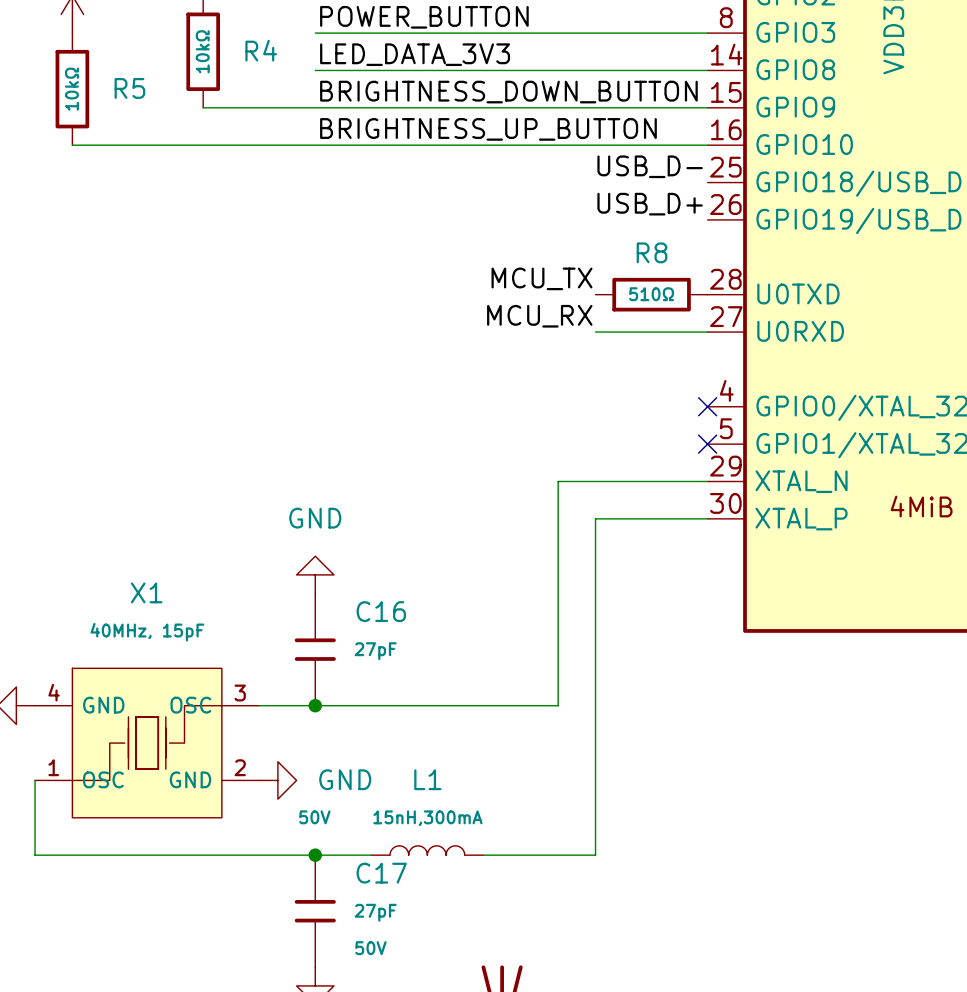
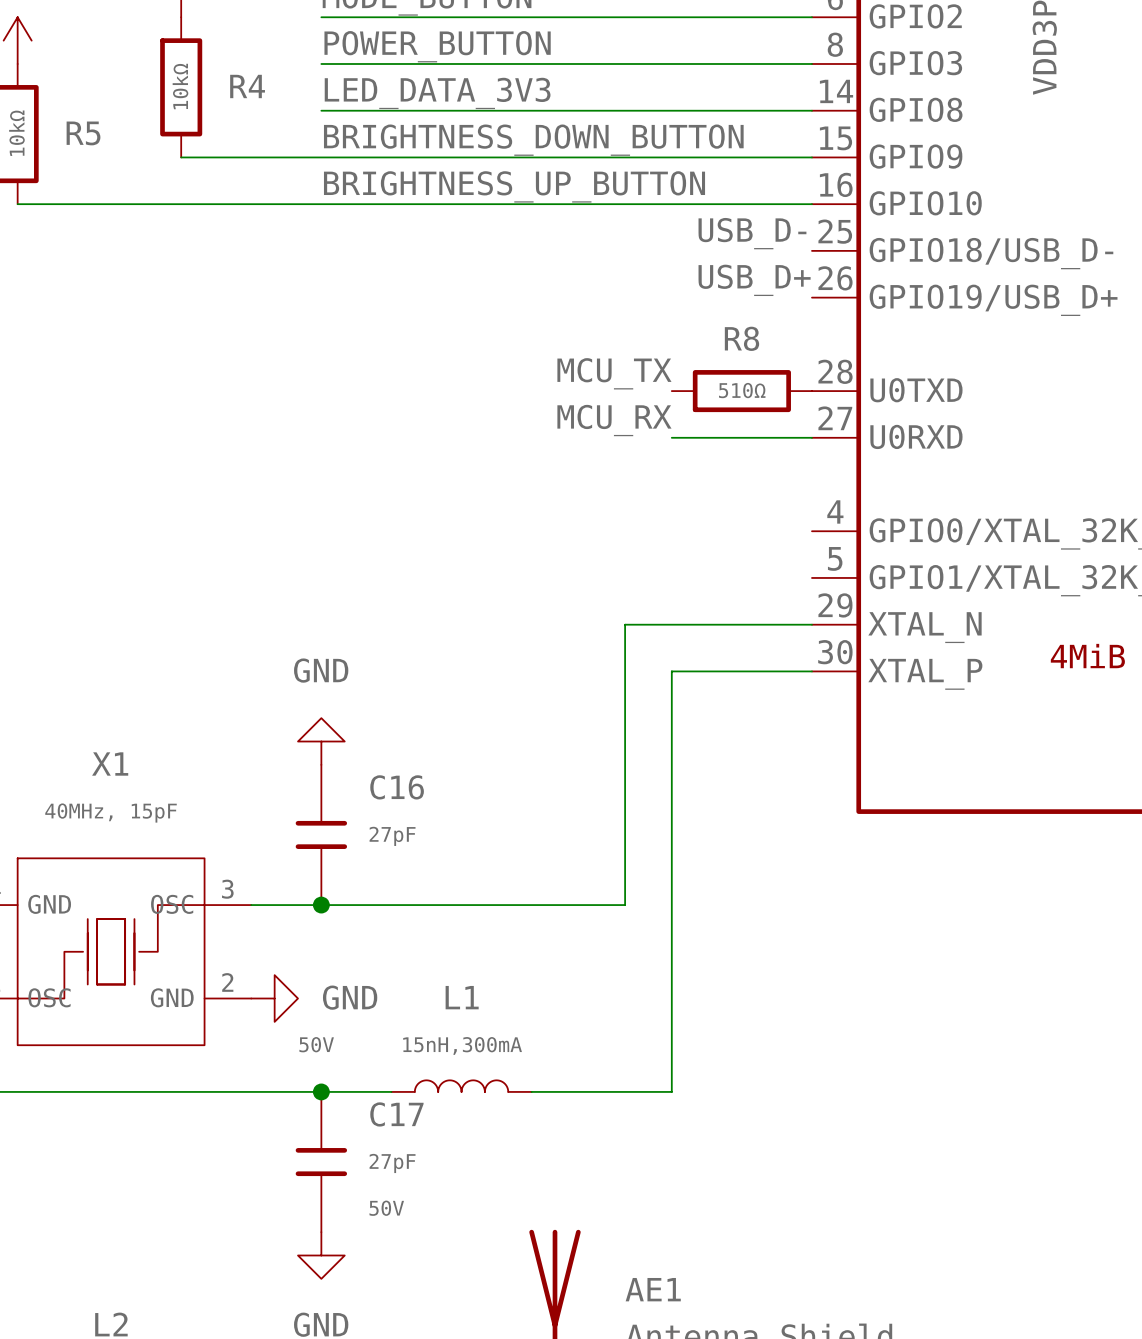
no-connect mark: (707, 406) -> none
no-connect mark: (707, 444) -> none

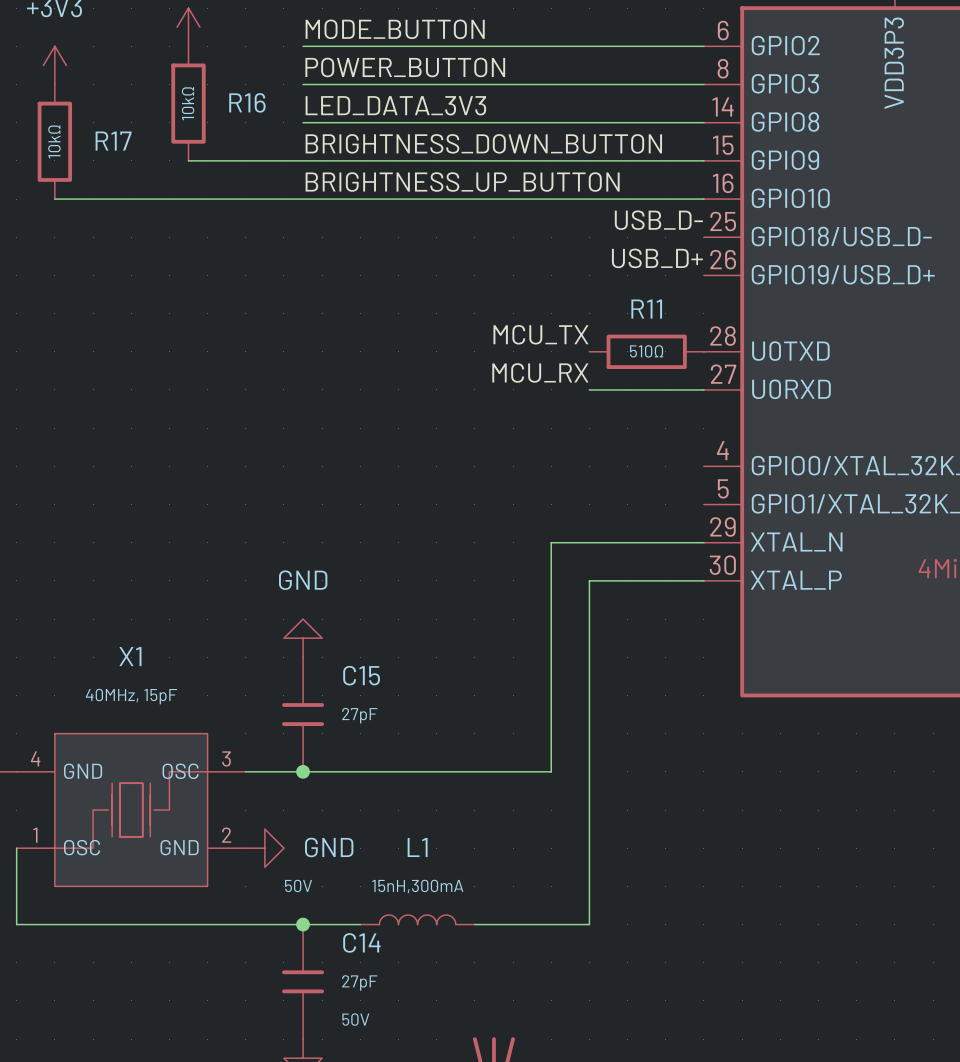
R4 name: R4 (247, 86) -> R16 (247, 102)
R5 name: R5 (83, 133) -> R17 (113, 141)
R8 name: R8 (741, 338) -> R11 (646, 309)
C16 name: C16 (397, 787) -> C15 (361, 675)
C17 name: C17 (396, 1114) -> C14 (361, 942)

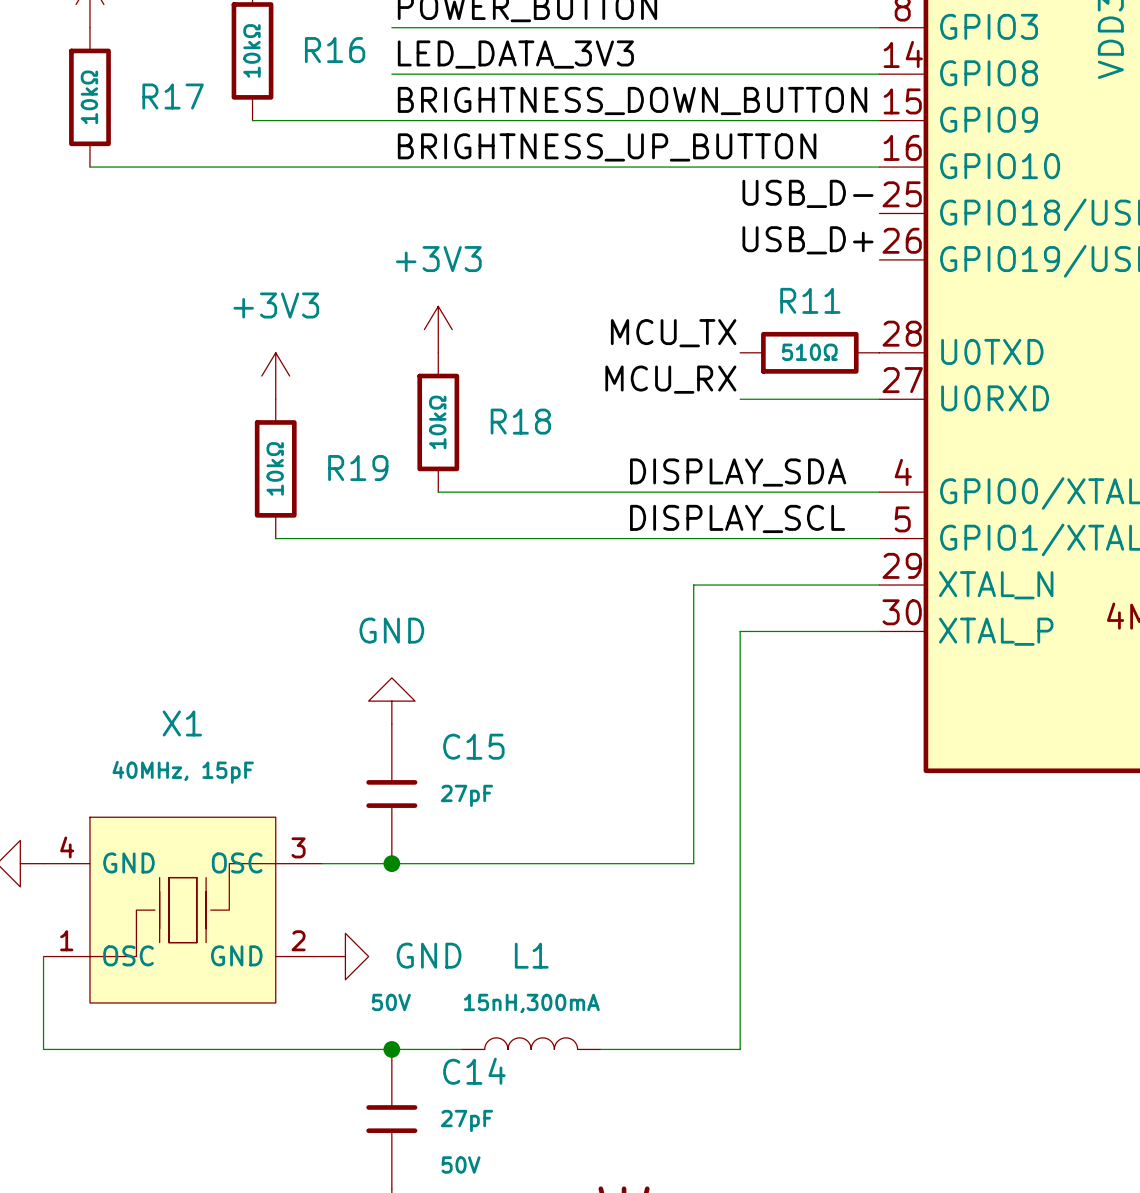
power symbol: none -> +3V3 (438, 329)
power symbol: none -> +3V3 (275, 376)
R18: none -> 10kΩ (438, 422)
R19: none -> 10kΩ (275, 468)
label: none -> DISPLAY_SDA (738, 472)
wire: none -> (438, 492) (879, 492)
label: none -> DISPLAY_SCL (737, 518)
wire: none -> (275, 538) (879, 538)

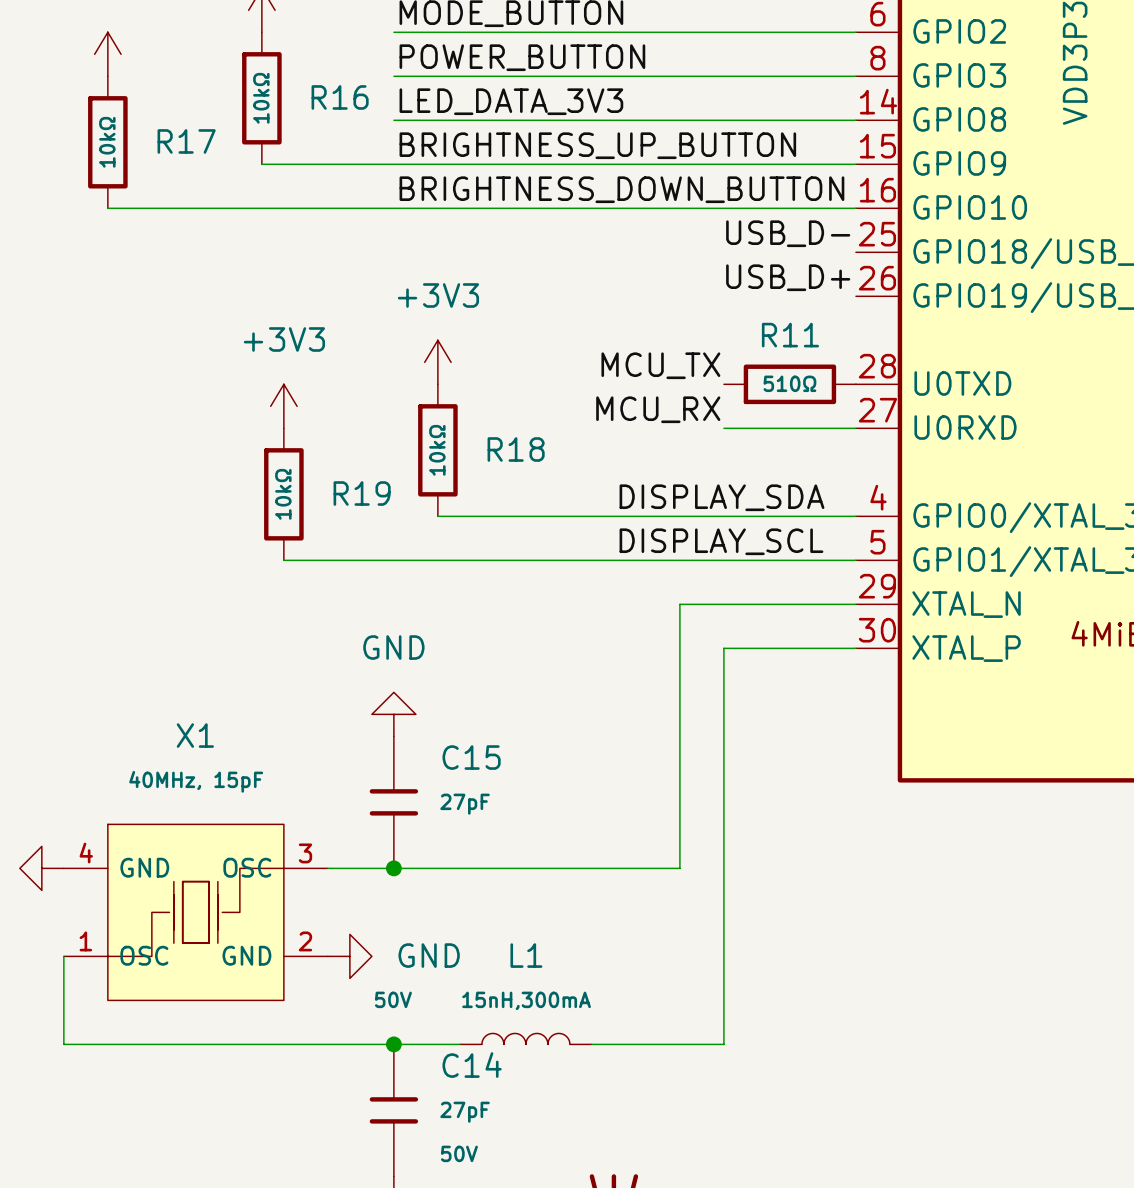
label: BRIGHTNESS_DOWN_BUTTON (632, 100) -> BRIGHTNESS_UP_BUTTON (597, 145)
label: BRIGHTNESS_UP_BUTTON (607, 147) -> BRIGHTNESS_DOWN_BUTTON (621, 189)

